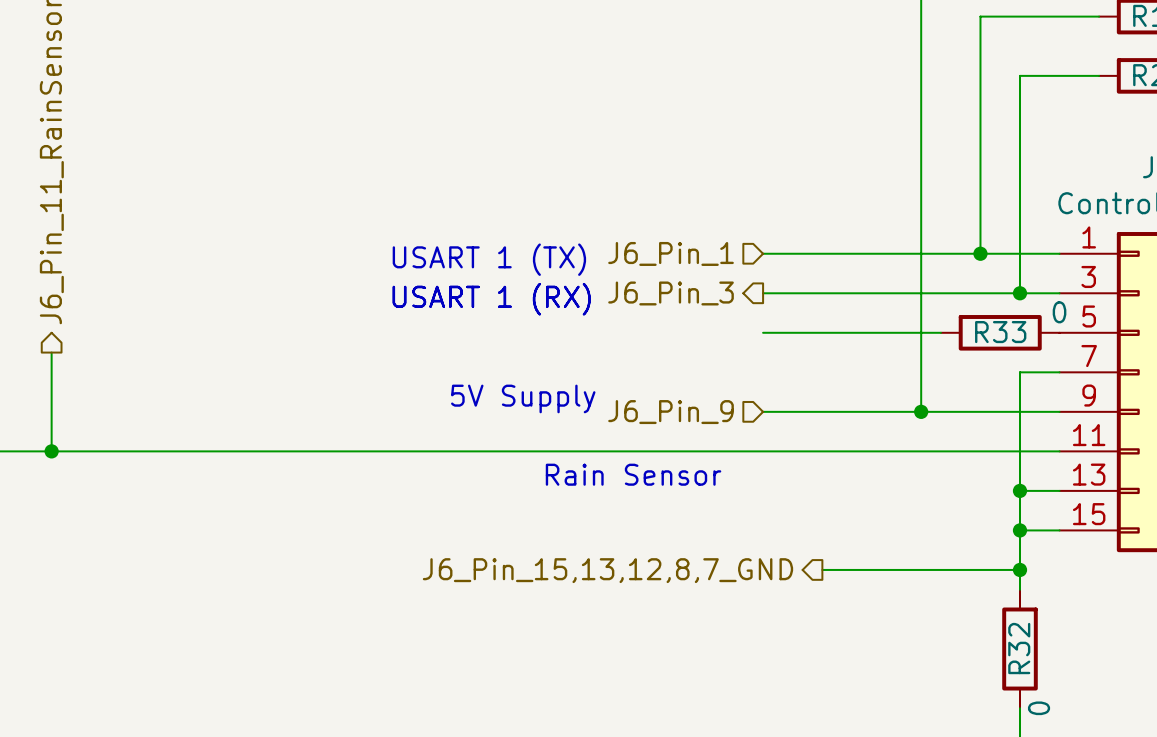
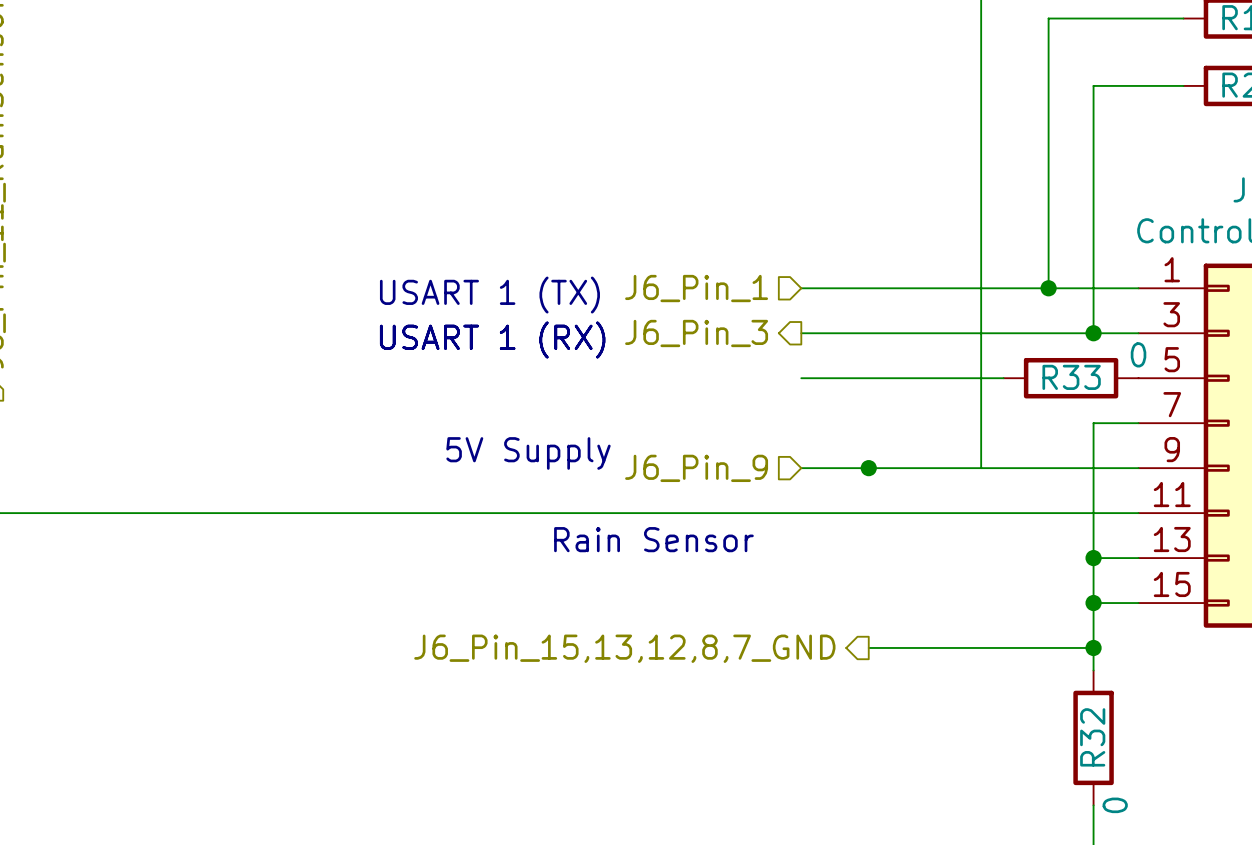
junction: none -> (868, 468)
junction: (921, 411) -> none

